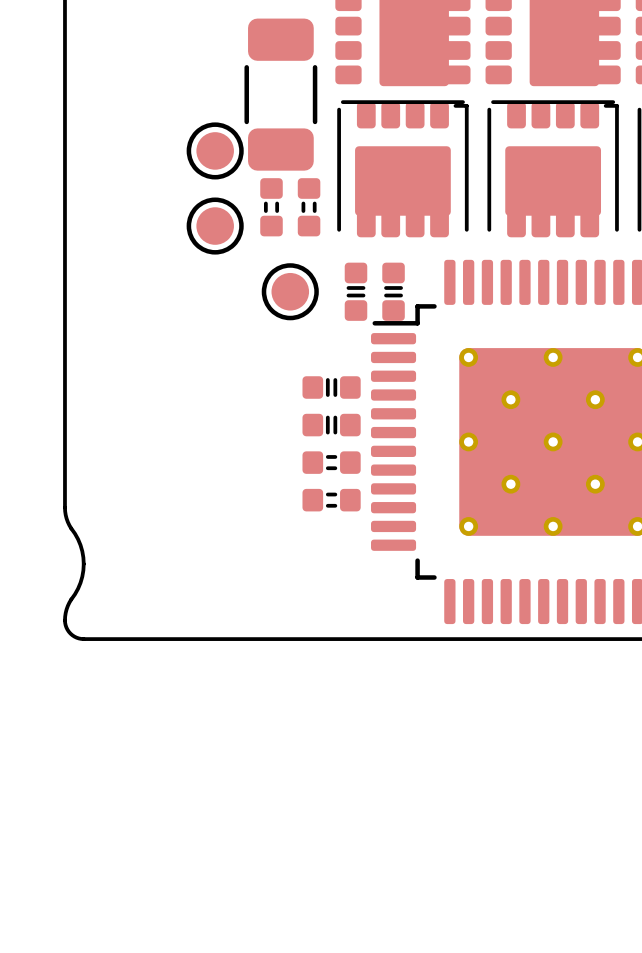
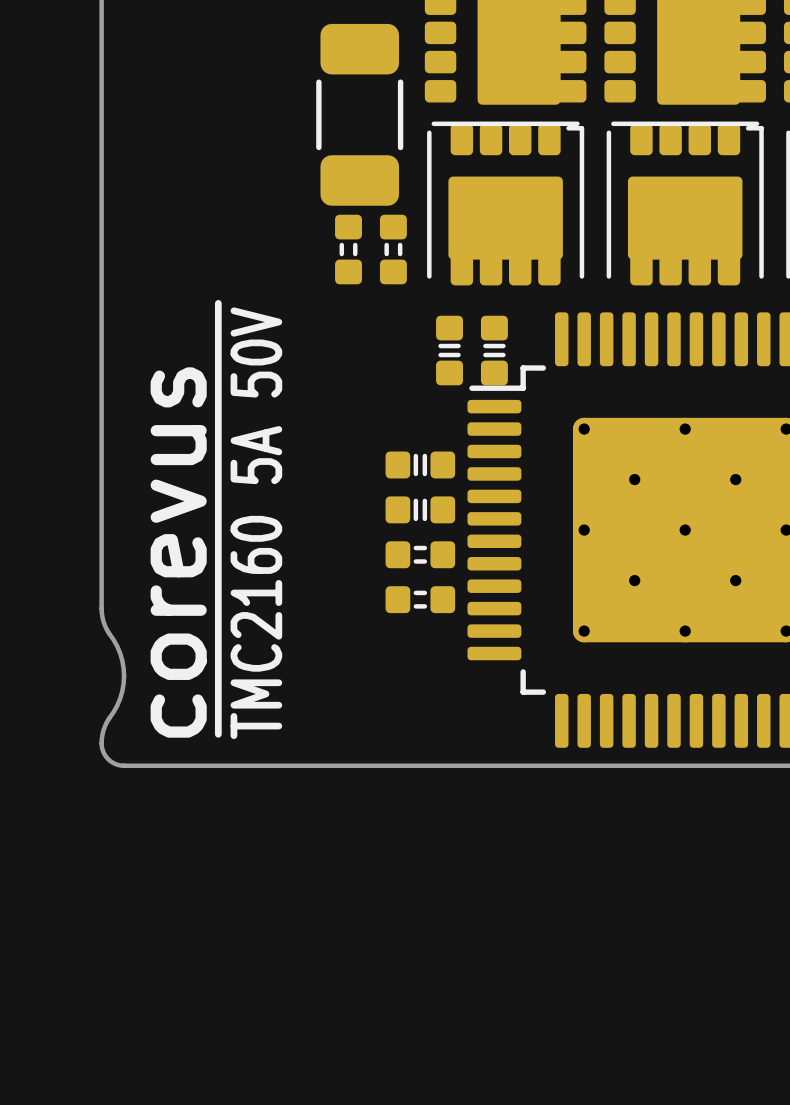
part: (215, 150) -> none
part: (215, 226) -> none
line: none -> (218, 303) (218, 734)
part: (290, 291) -> none
text: none -> TMC2160 5A 50V (256, 523)
text: none -> corevus (178, 552)

